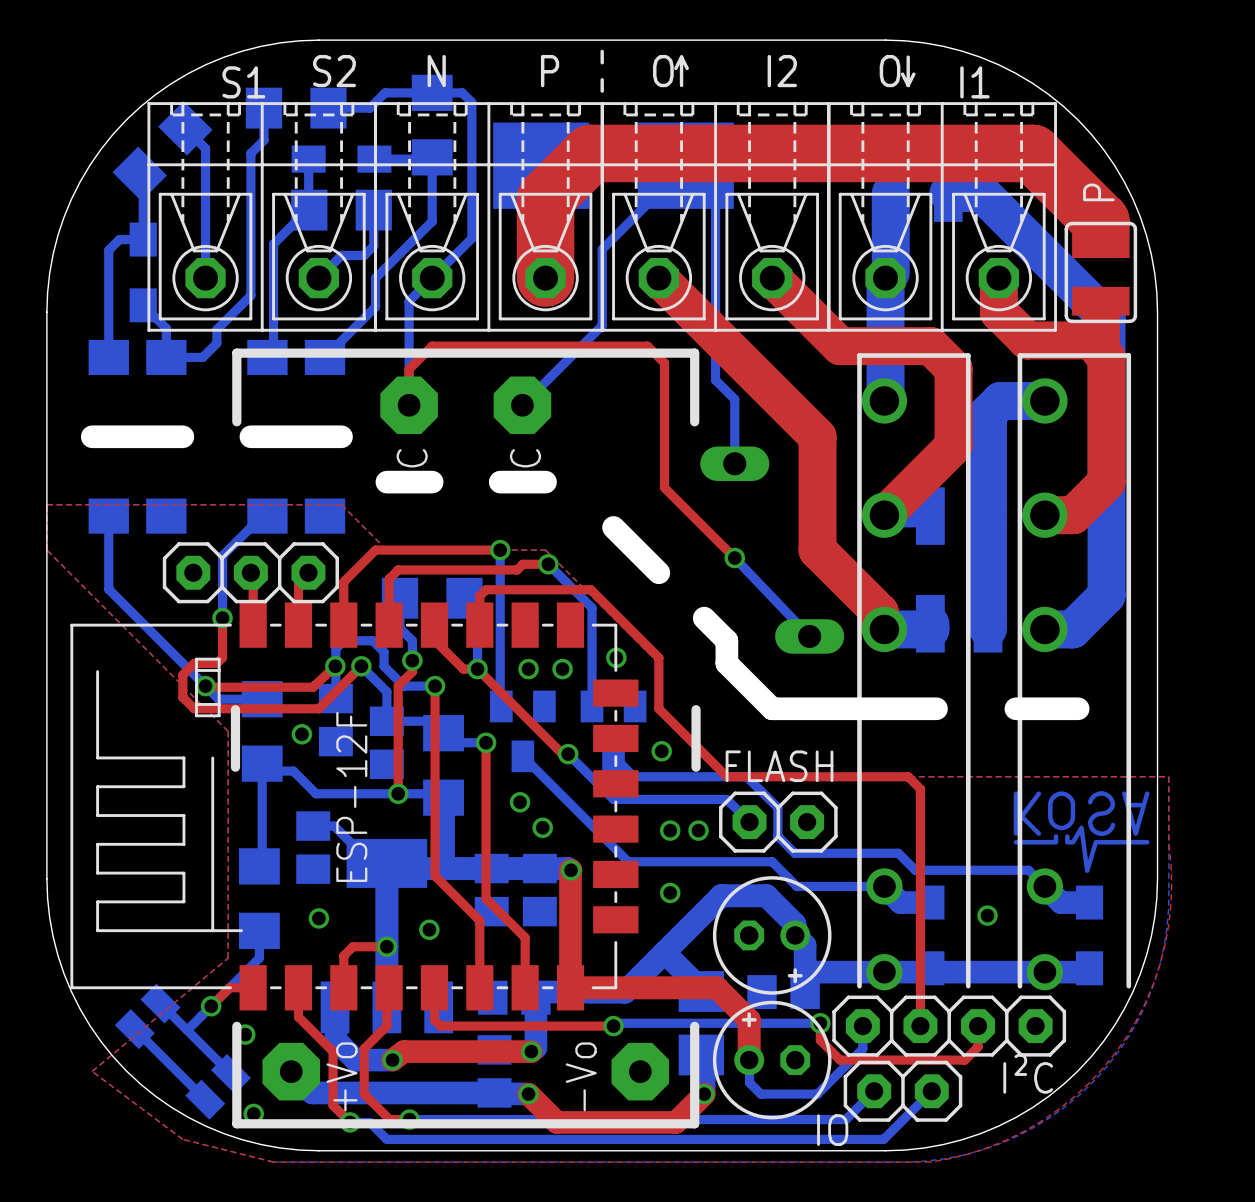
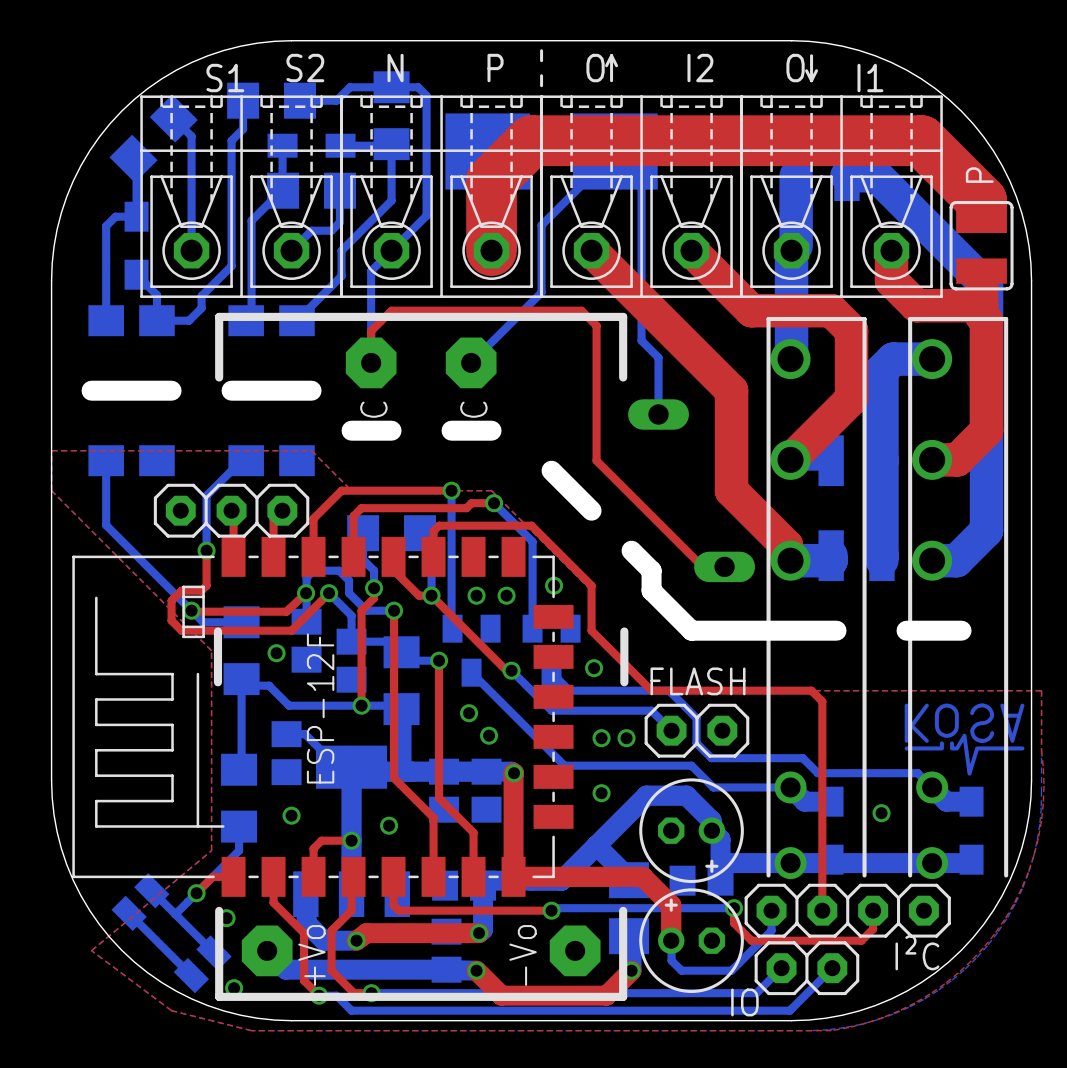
top track: (664, 487) (734, 558) -> (596, 435) (596, 460) (702, 566) (722, 566)
bottom track: (734, 558) (809, 636) -> none
via: (734, 558) -> none

